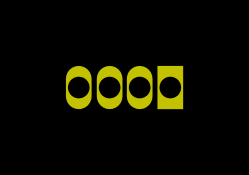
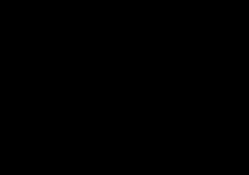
part: (124, 87) -> none

